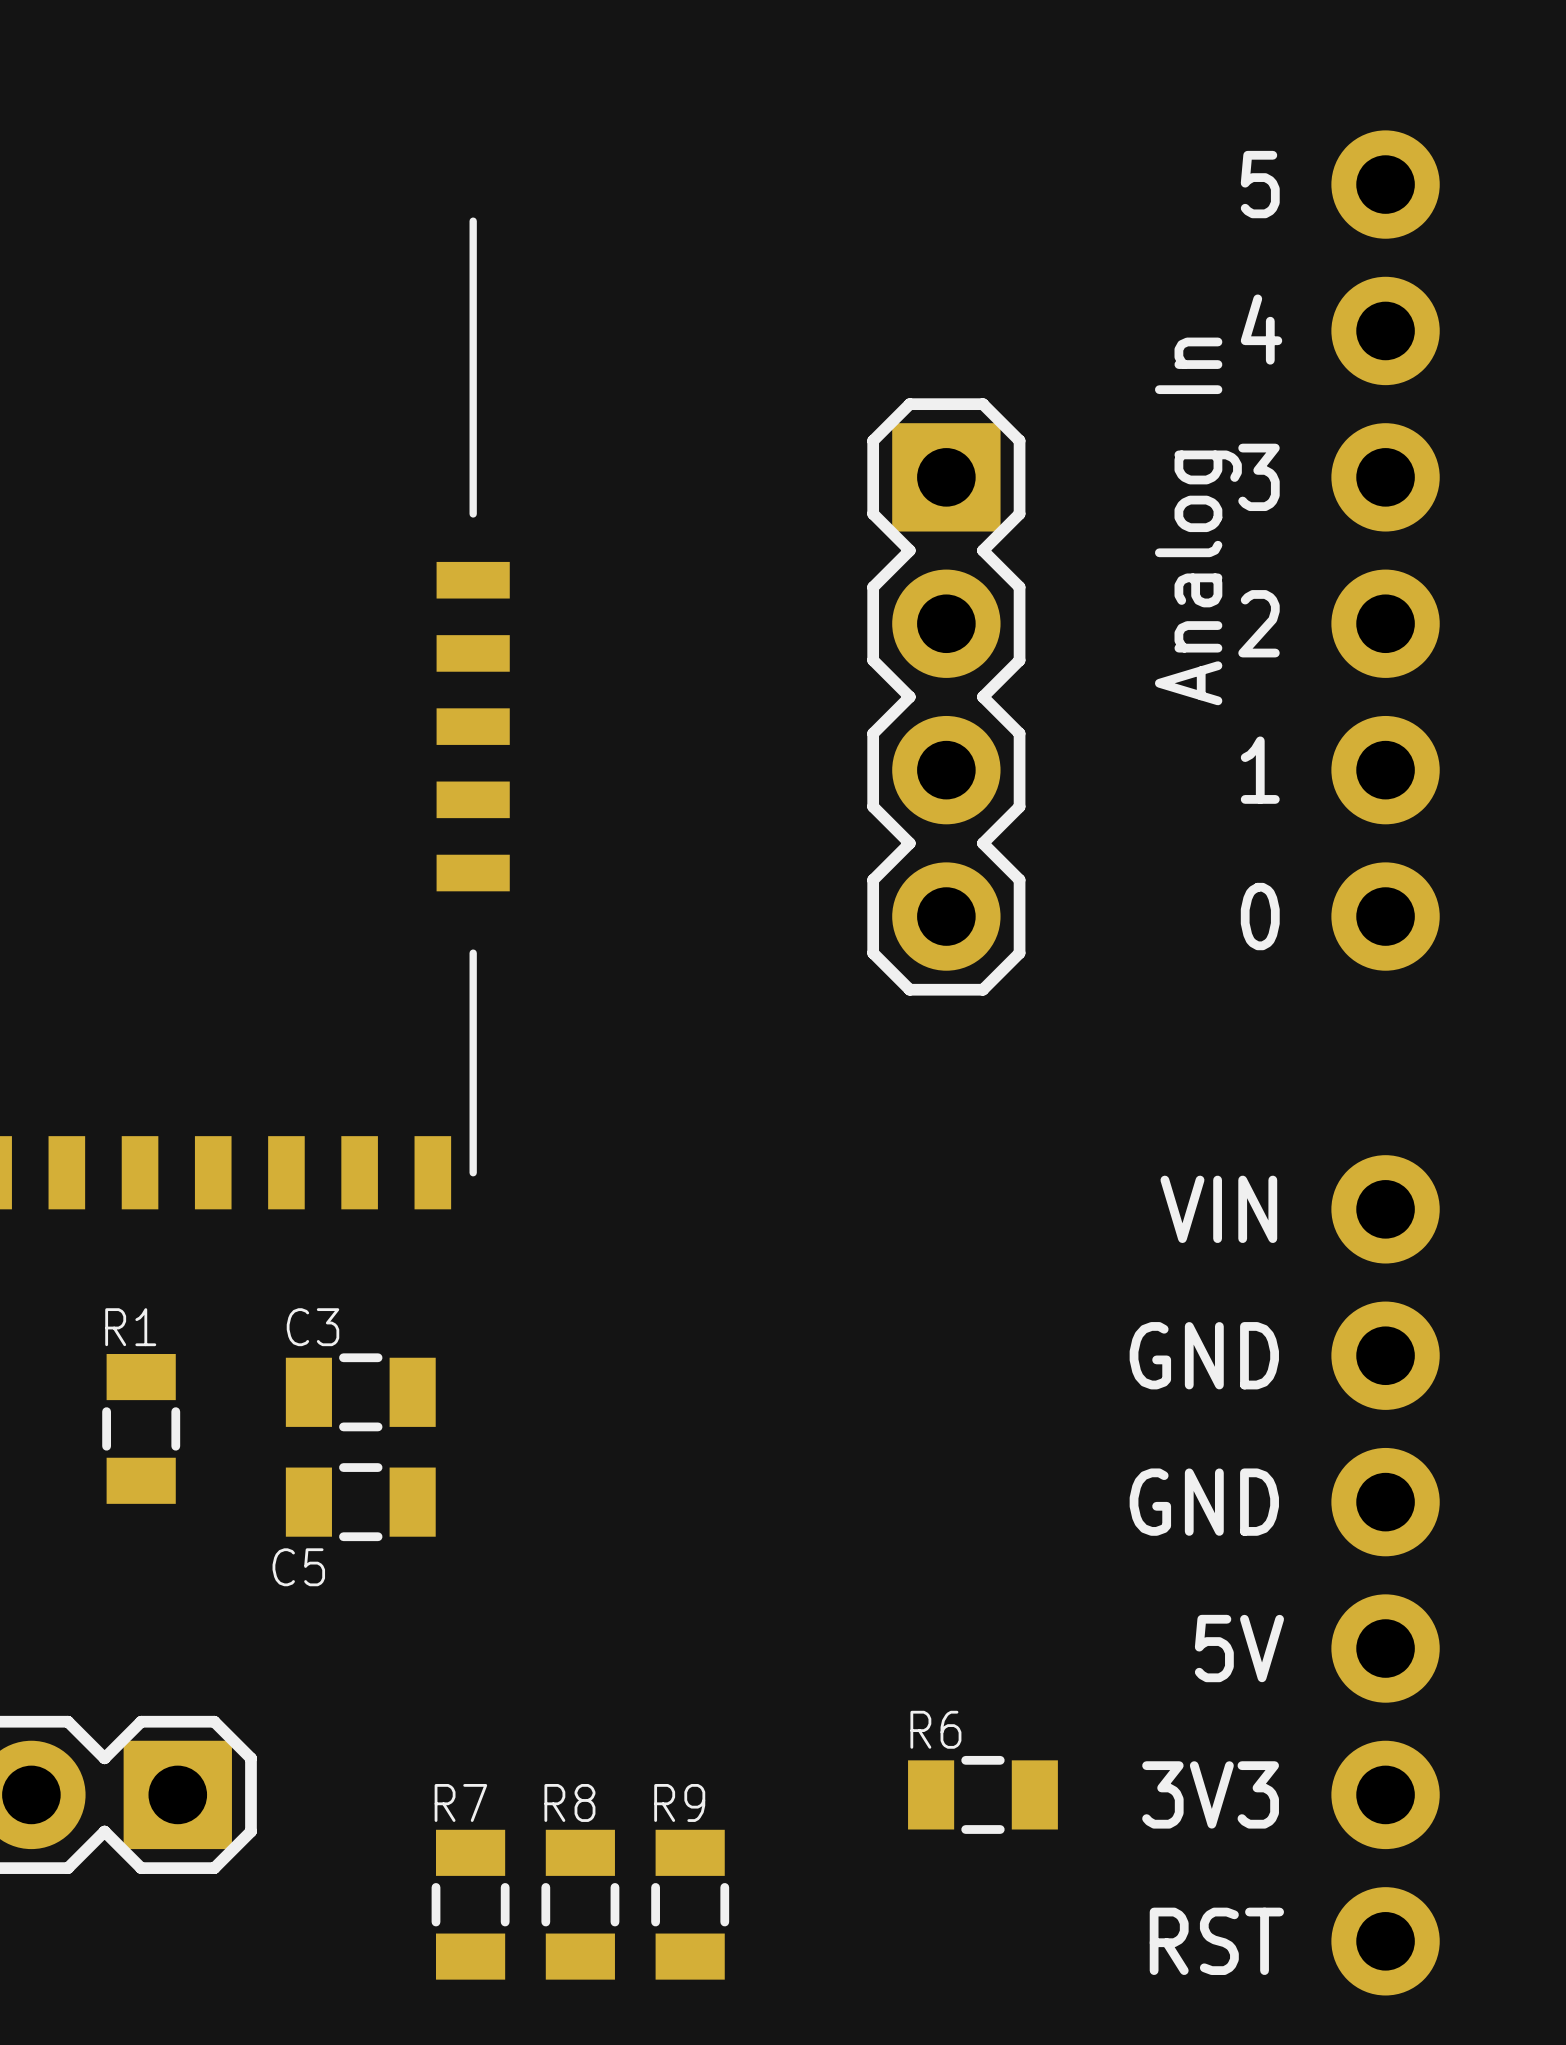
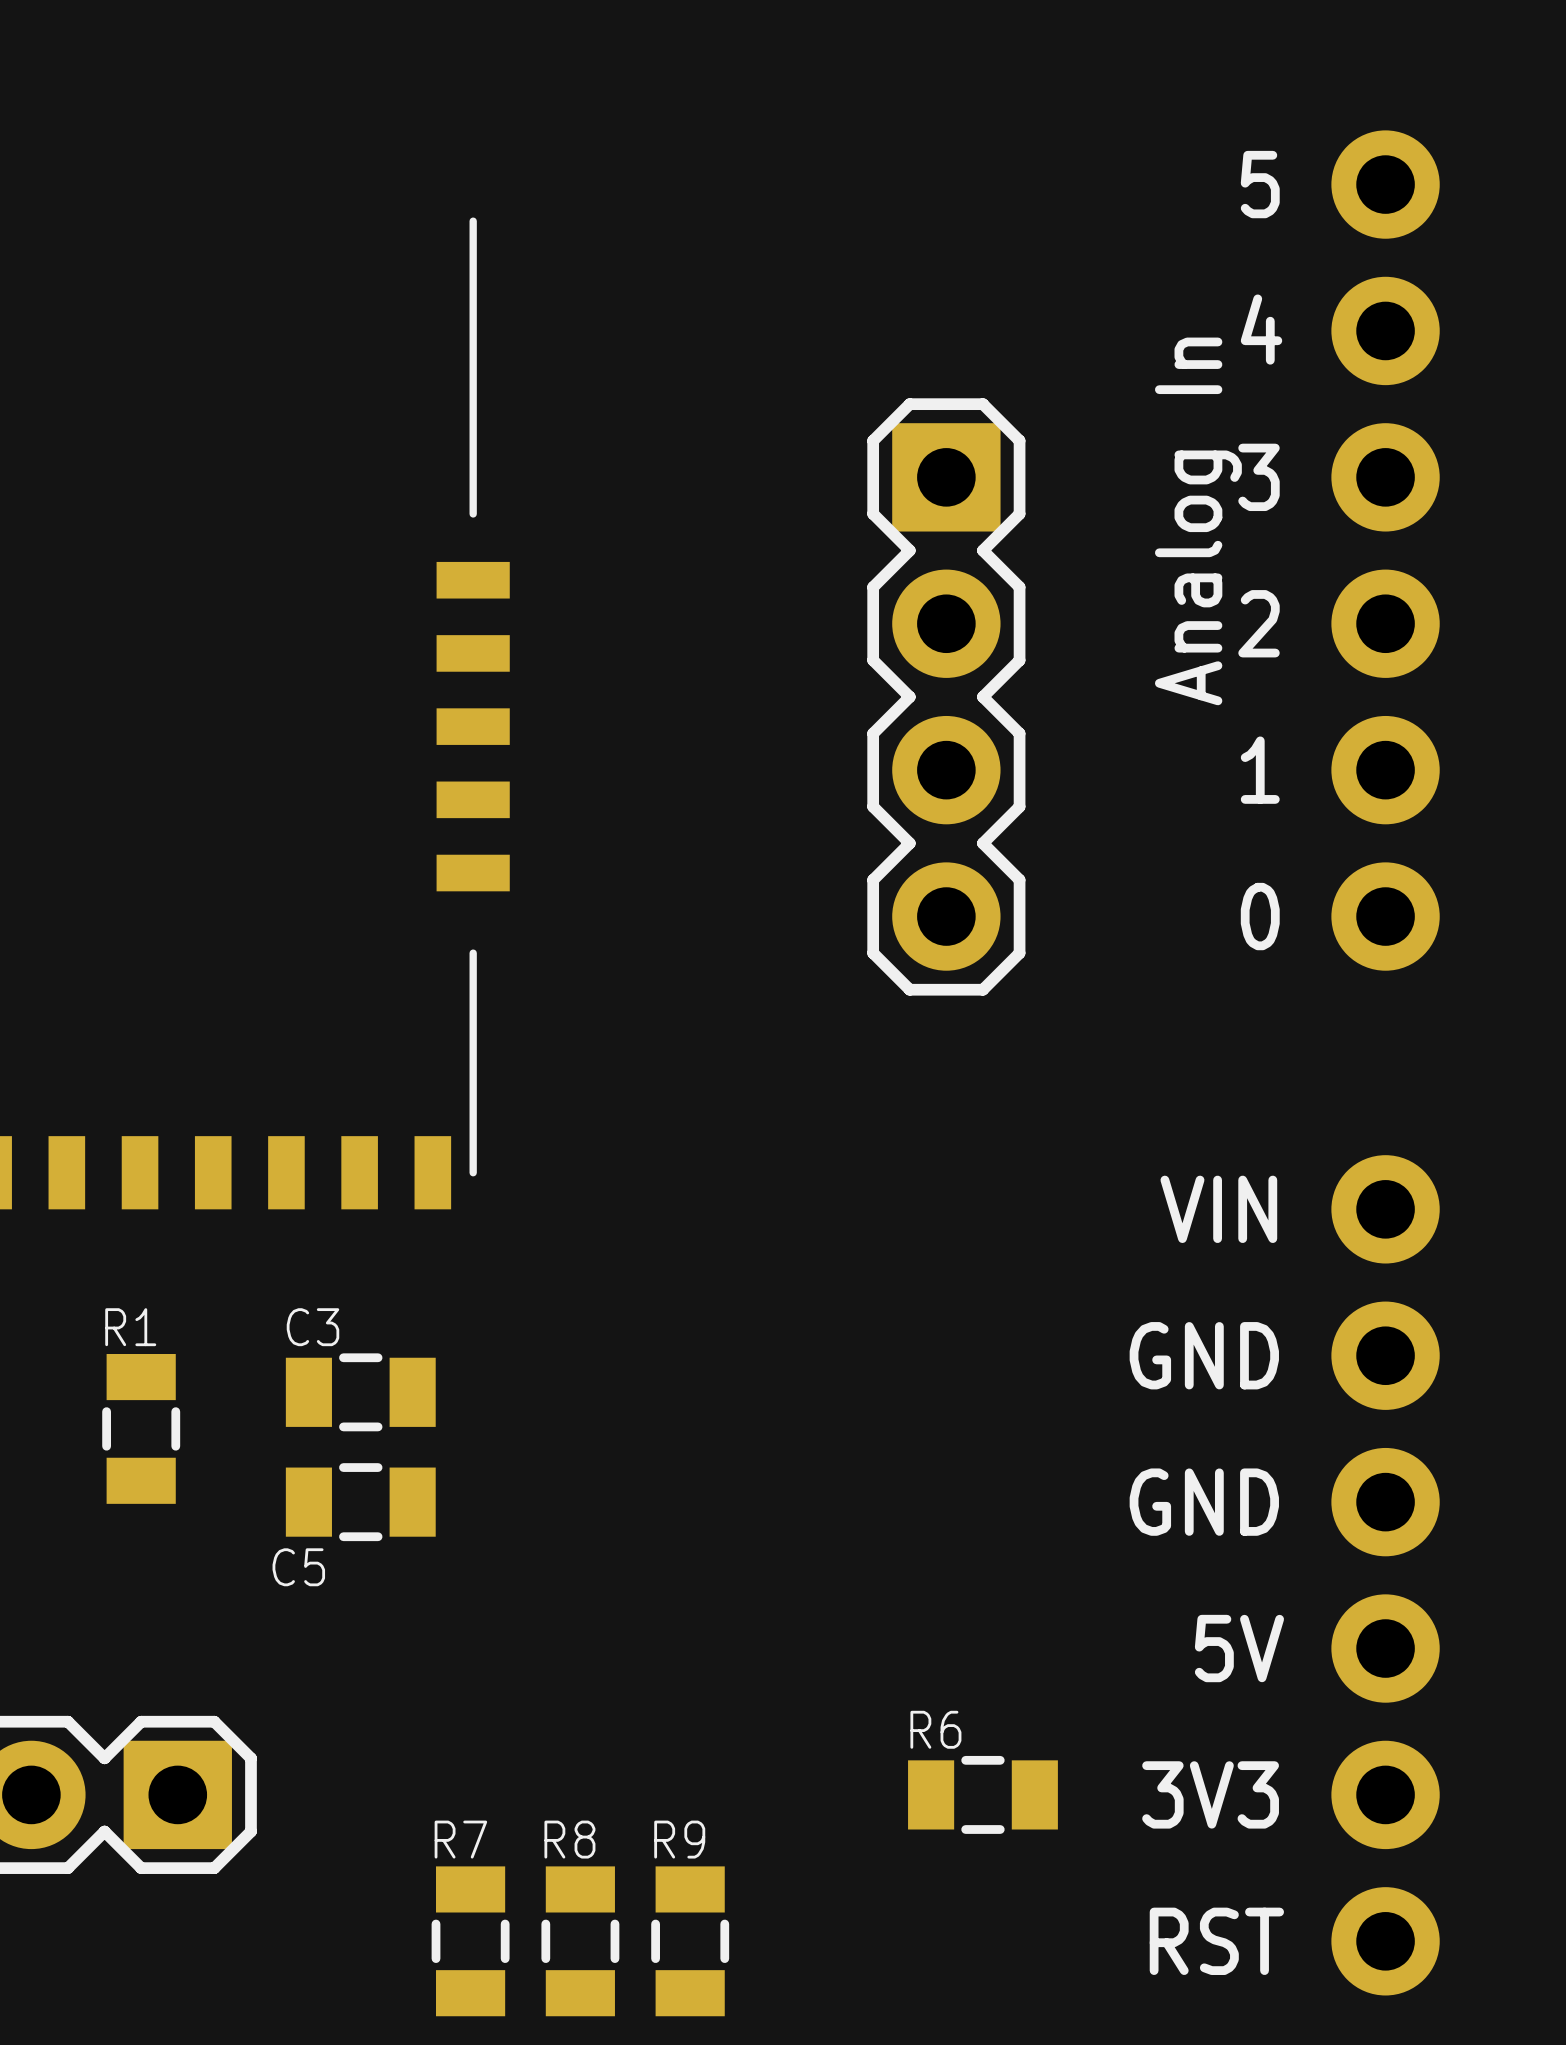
R7 position: (470, 1904) -> (470, 1941)
R8 position: (580, 1904) -> (580, 1941)
R9 position: (690, 1904) -> (690, 1941)

